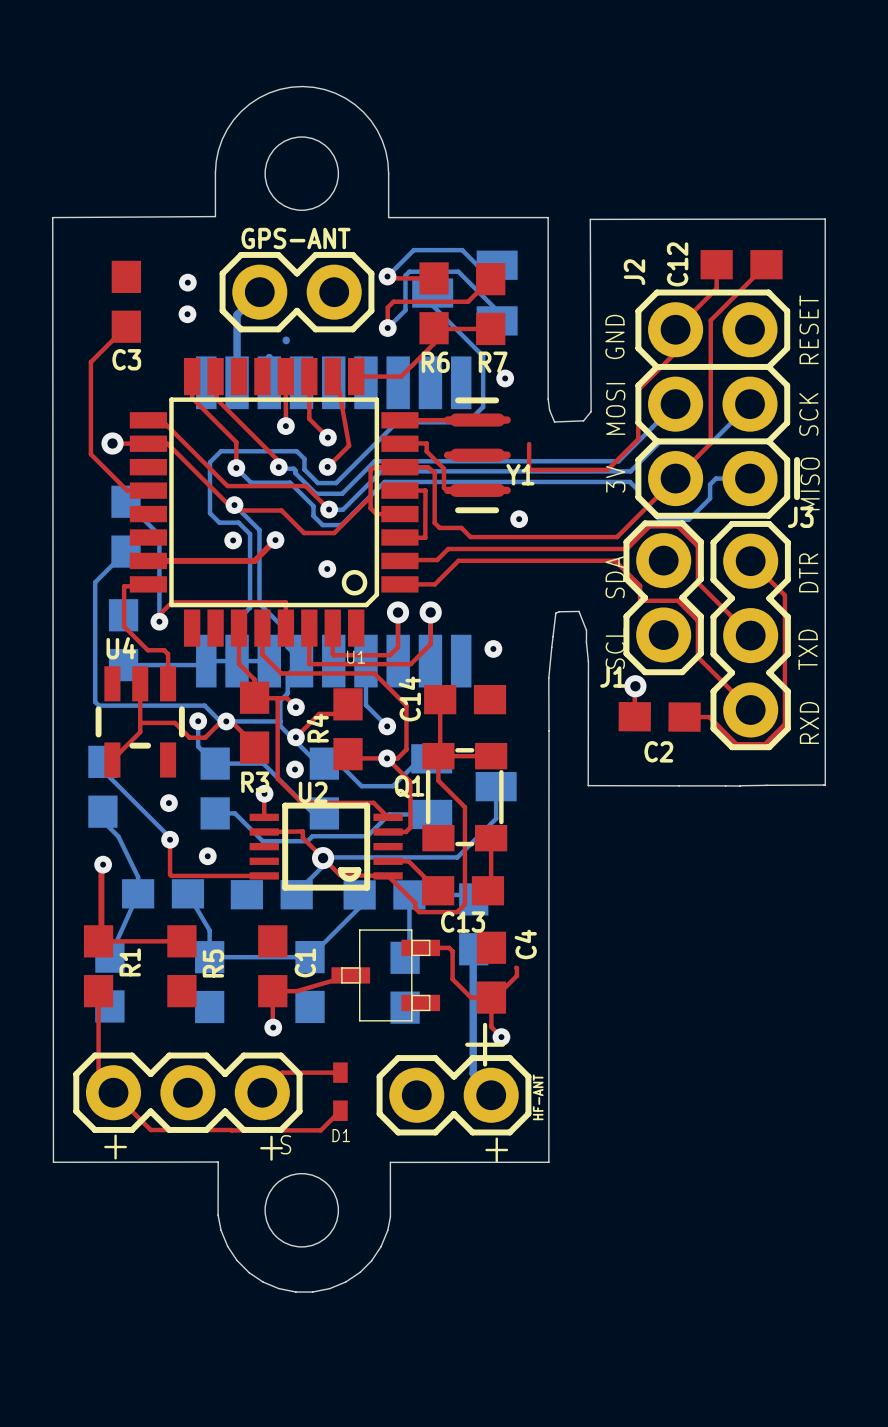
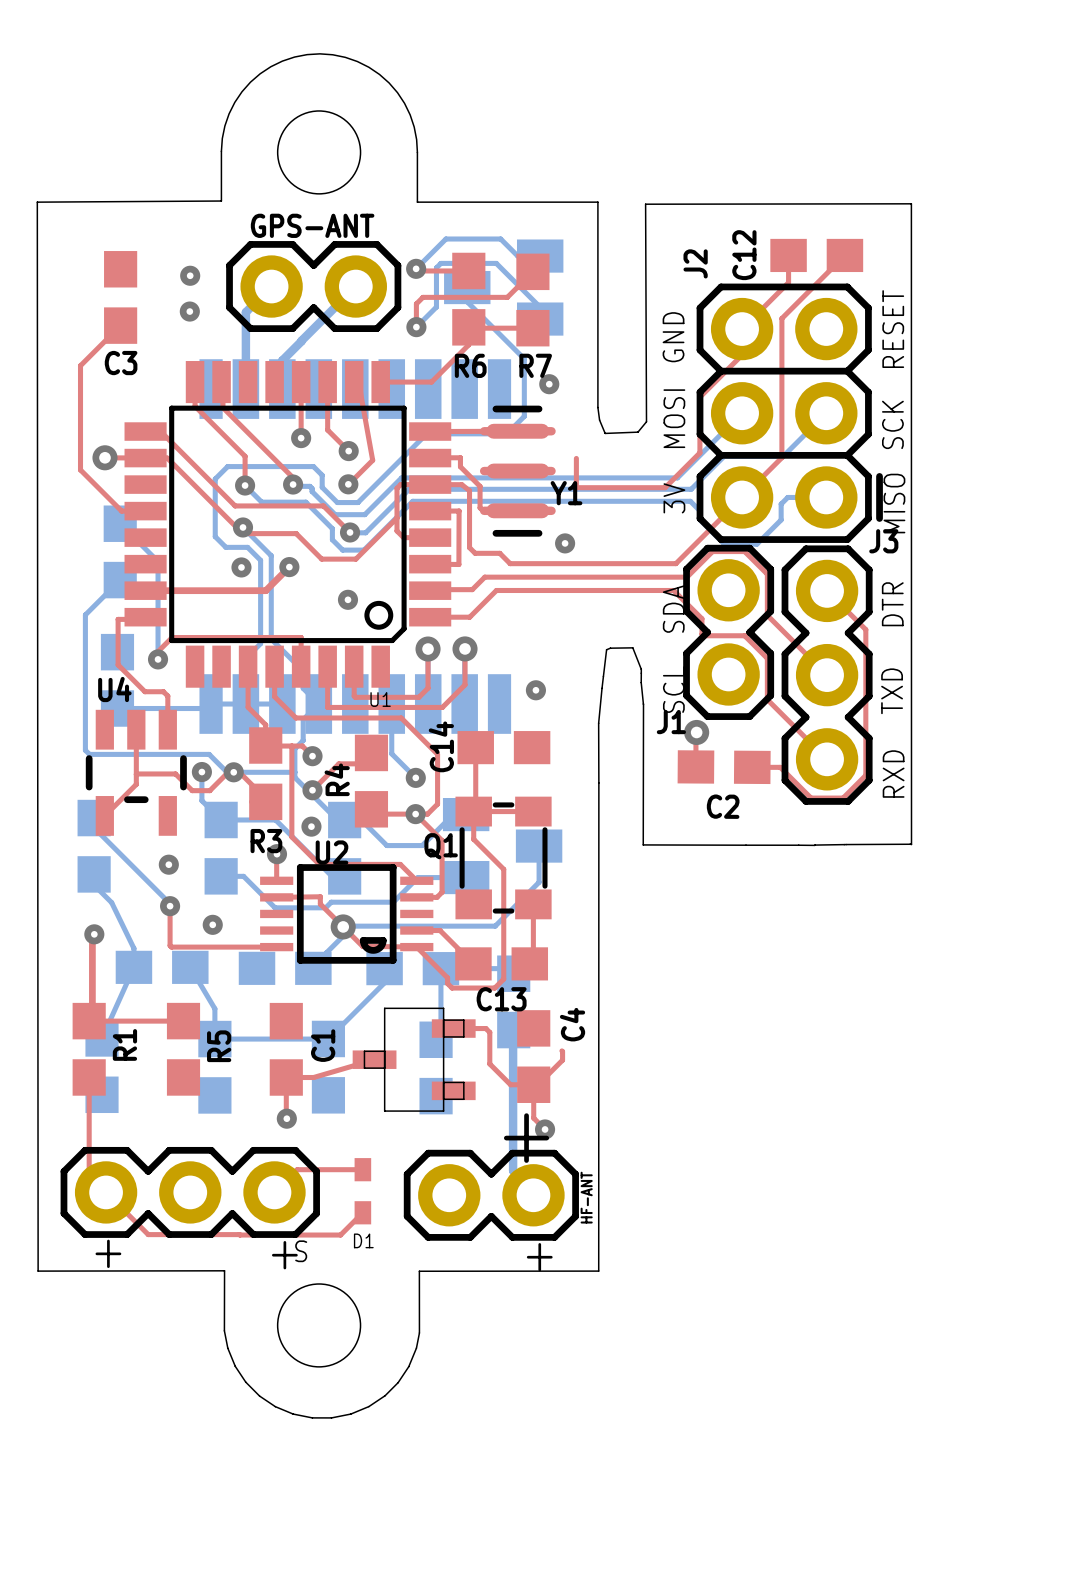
bottom track: none -> (355, 286) (301, 340)
bottom track: none -> (301, 341) (282, 360)

